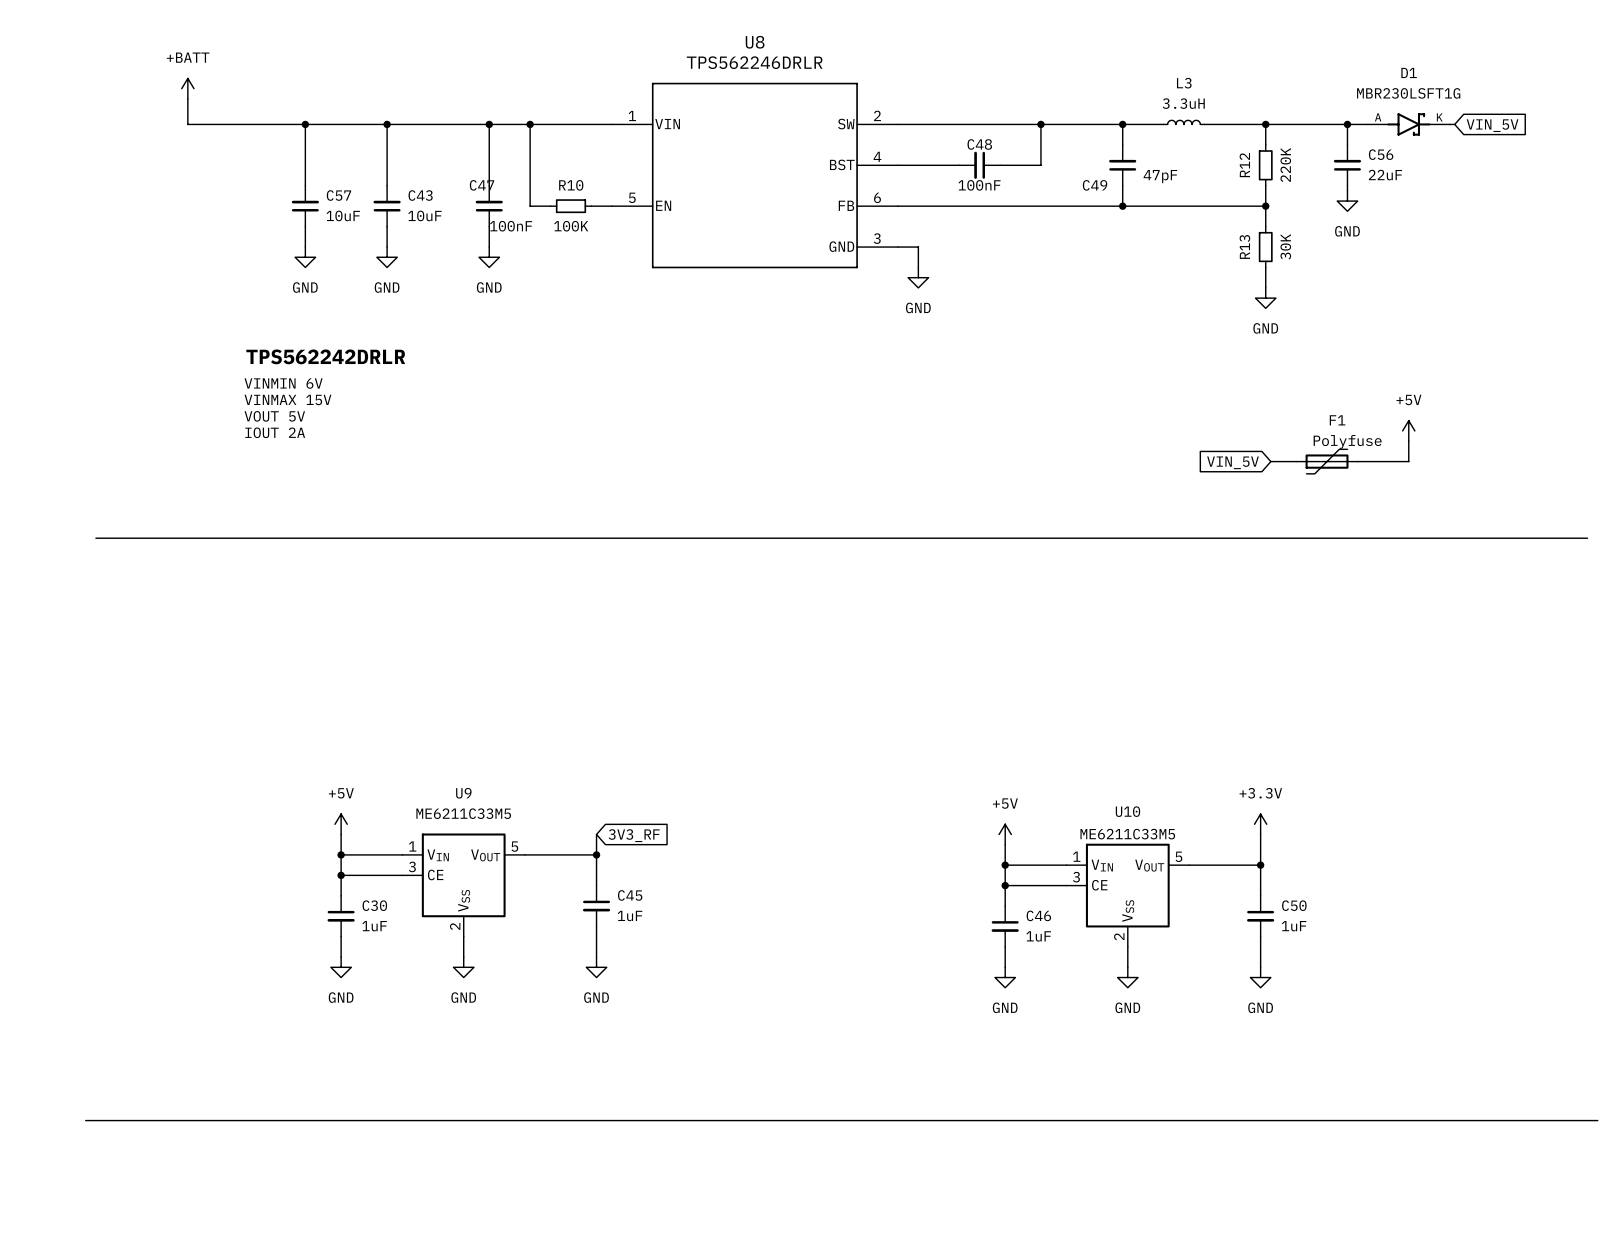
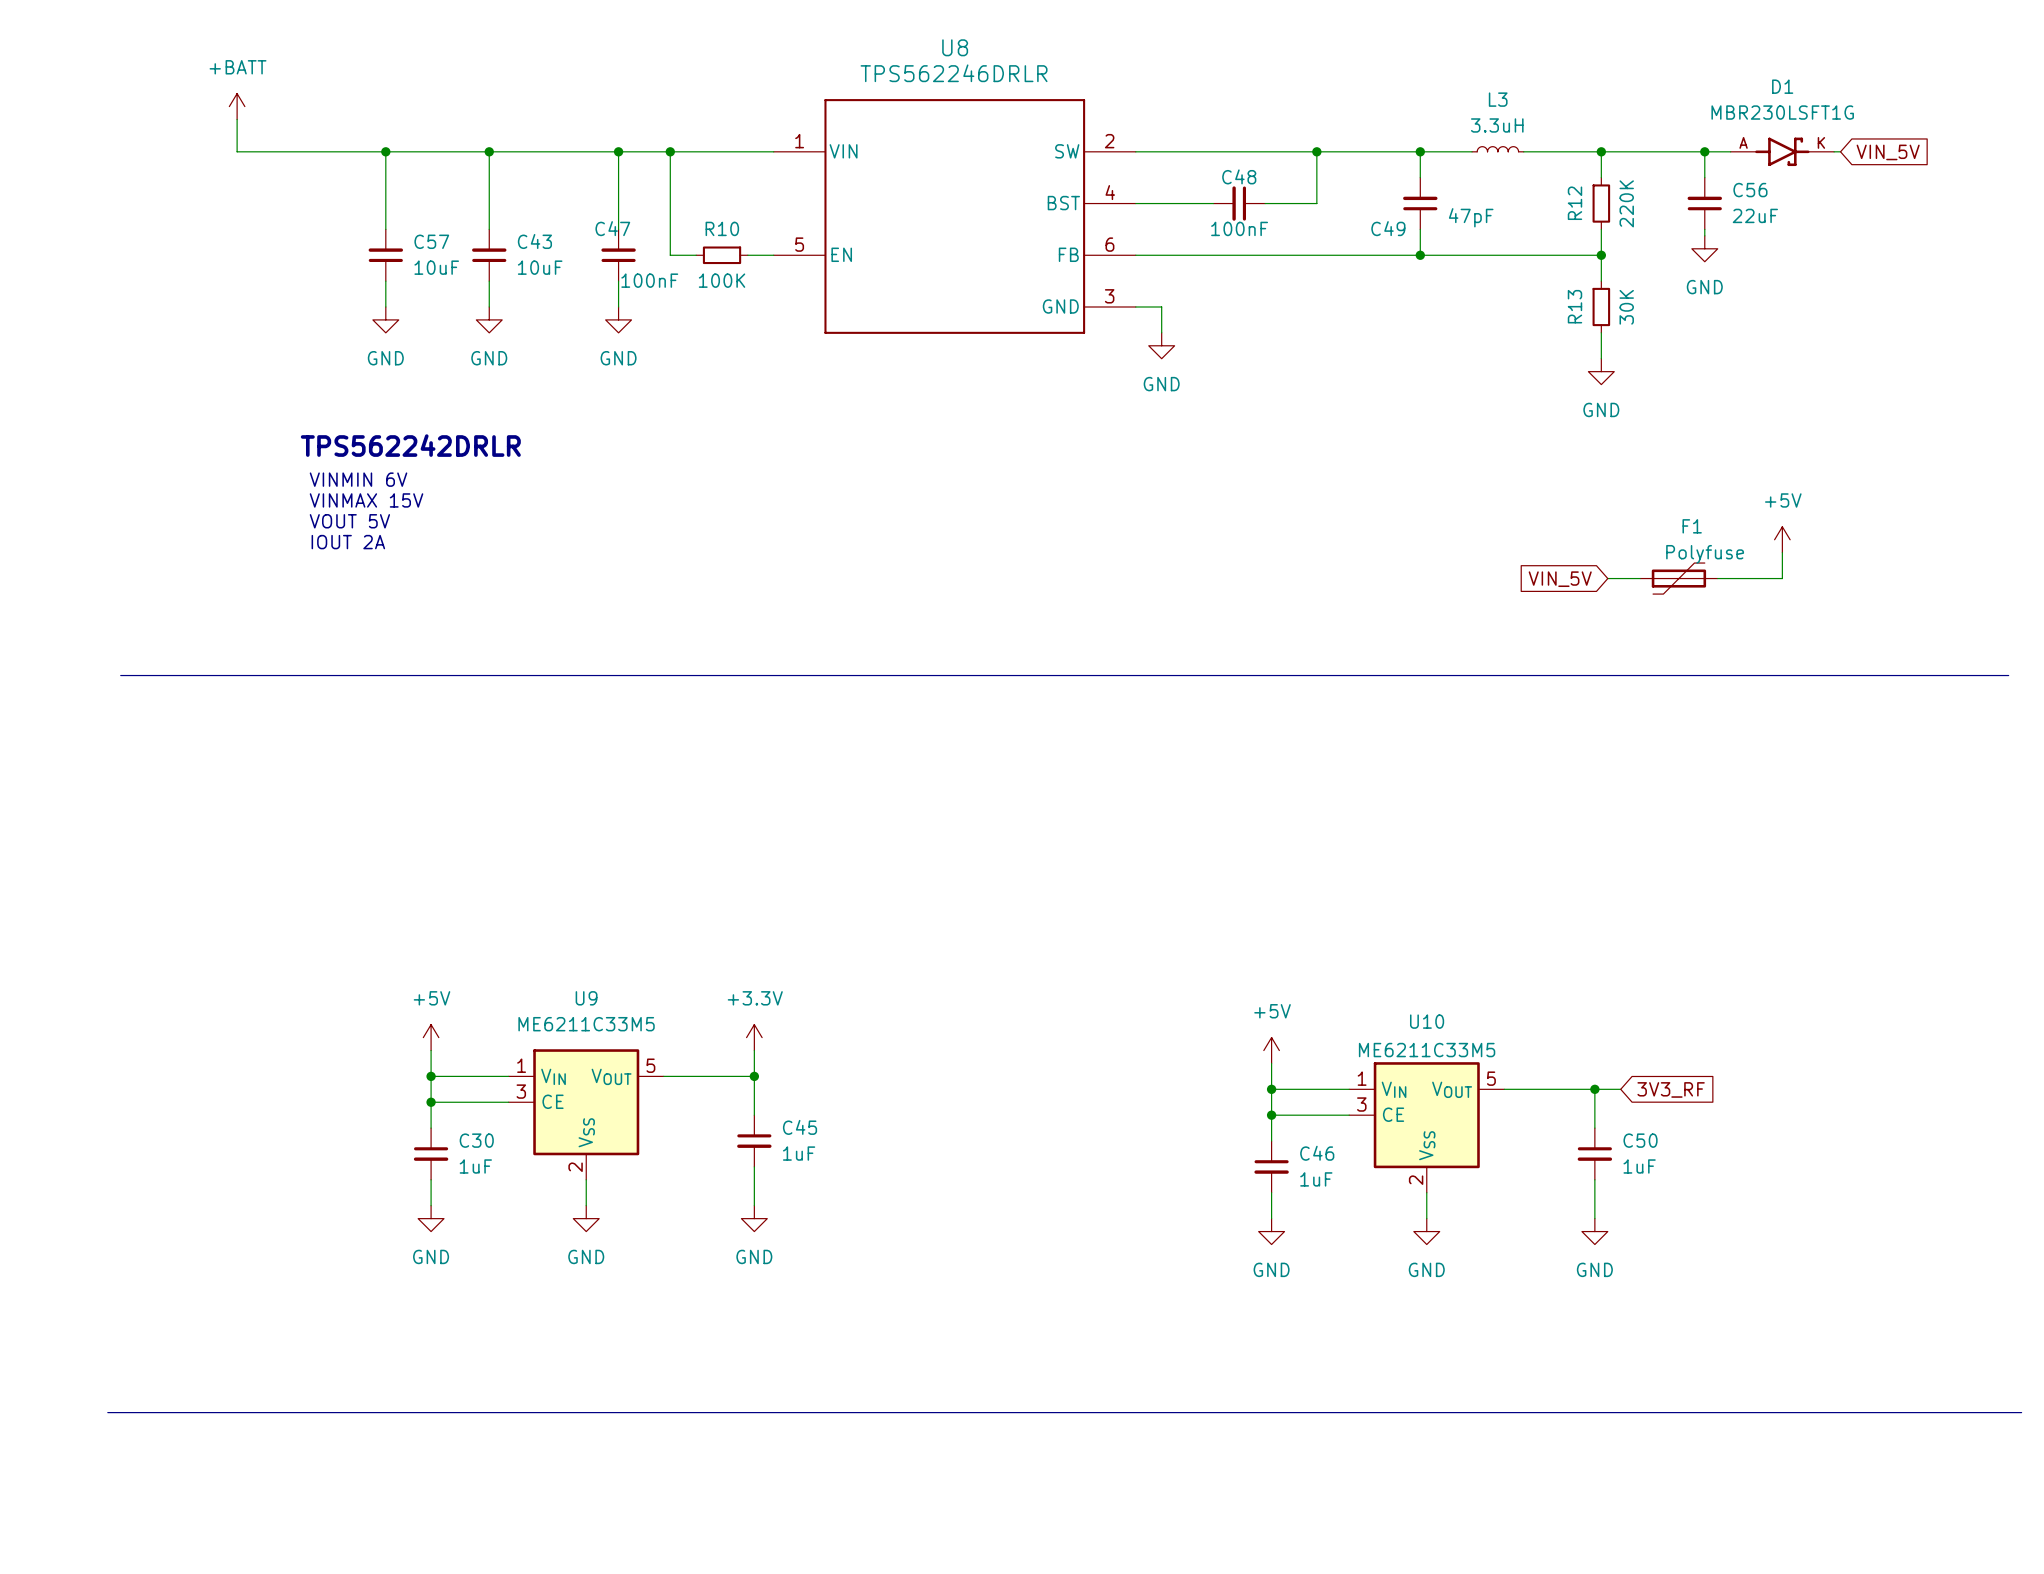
power symbol: none -> +3.3V (754, 1037)
power symbol: +3.3V (1260, 824) -> none
wire: (1260, 834) (1260, 865) -> (1620, 1089) (1594, 1089)
global label: 3V3_RF (634, 835) -> none
global label: none -> 3V3_RF (1671, 1089)

